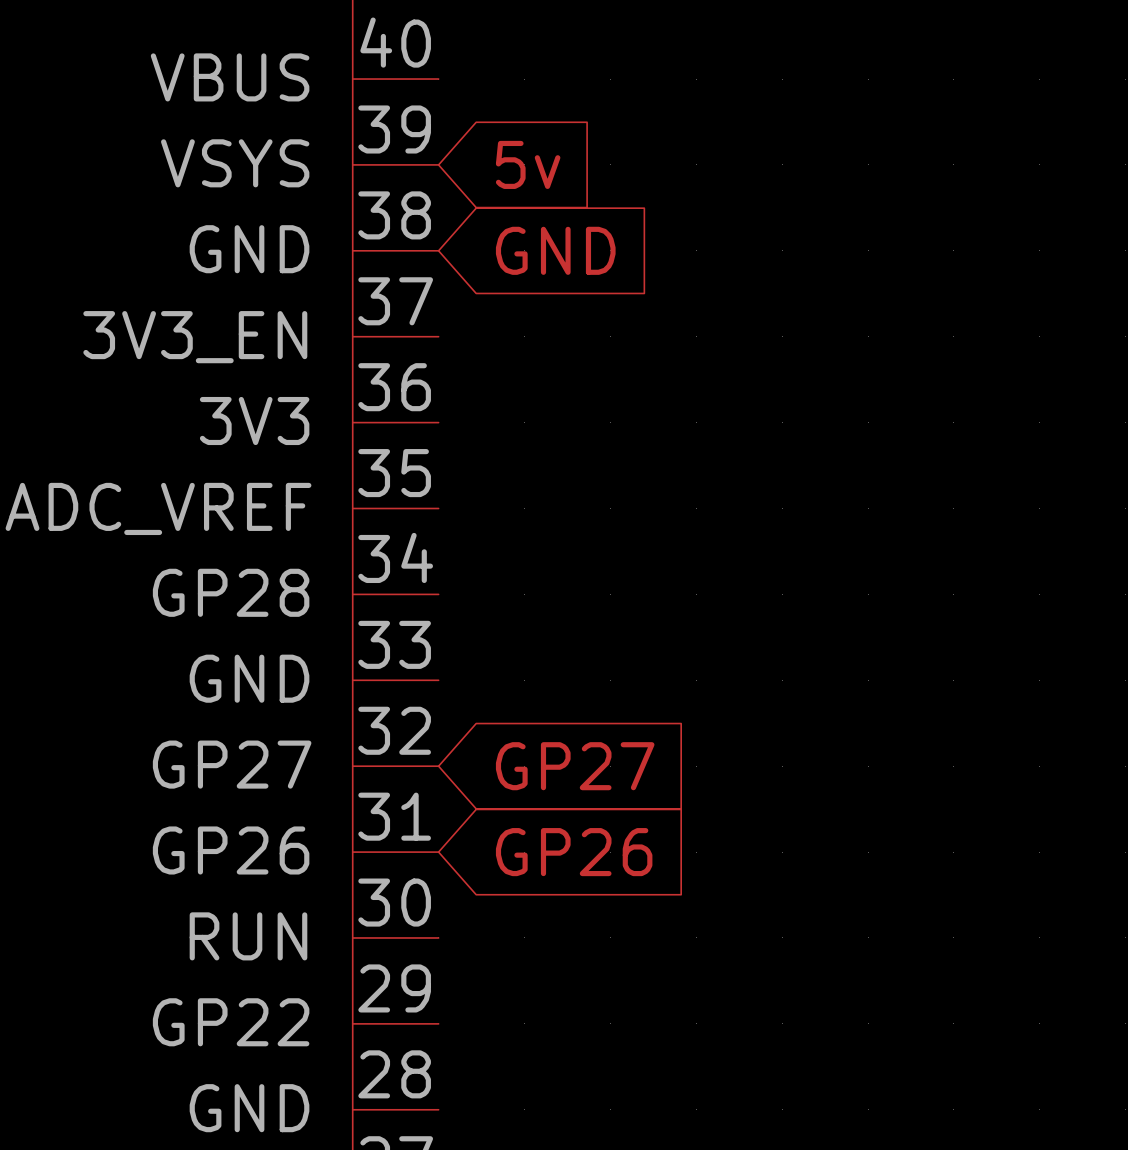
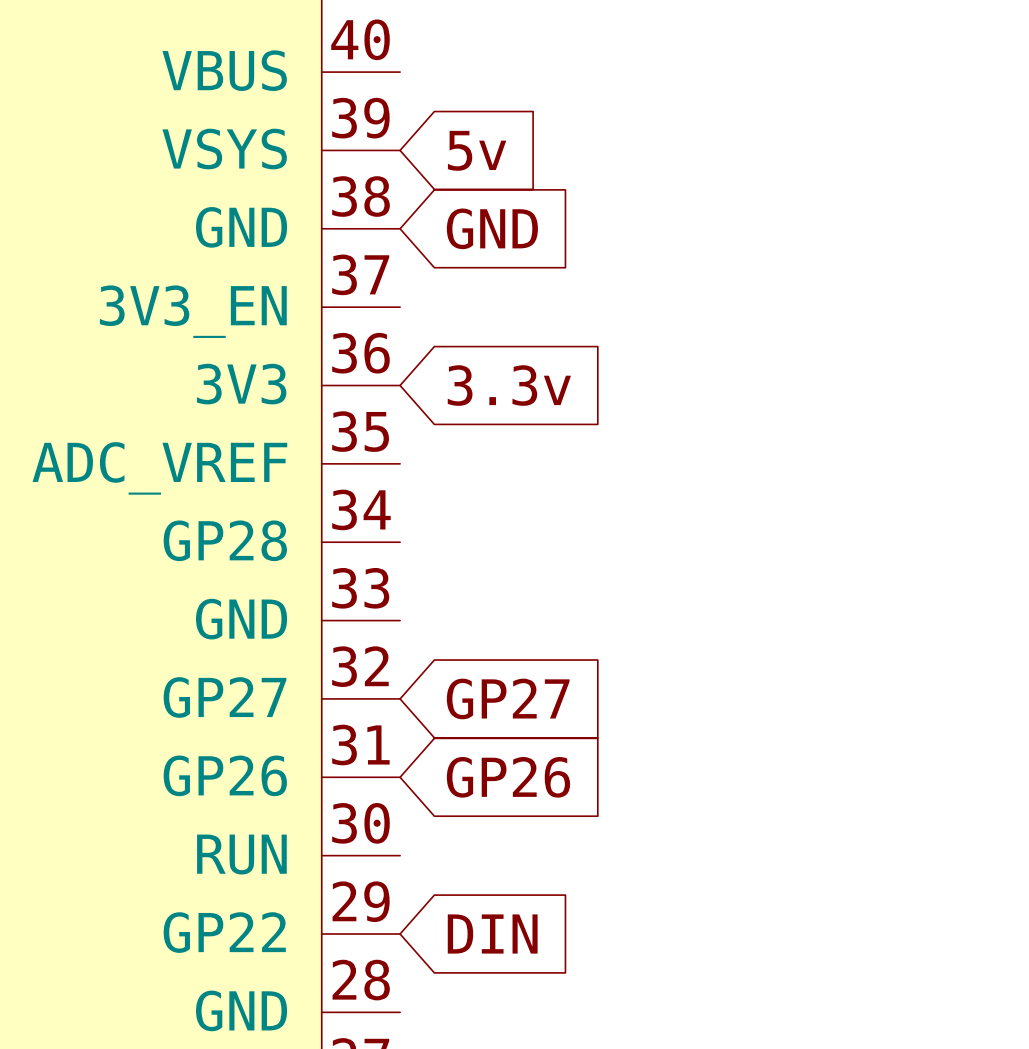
global label: none -> 3.3v (509, 385)
global label: none -> DIN (492, 934)

